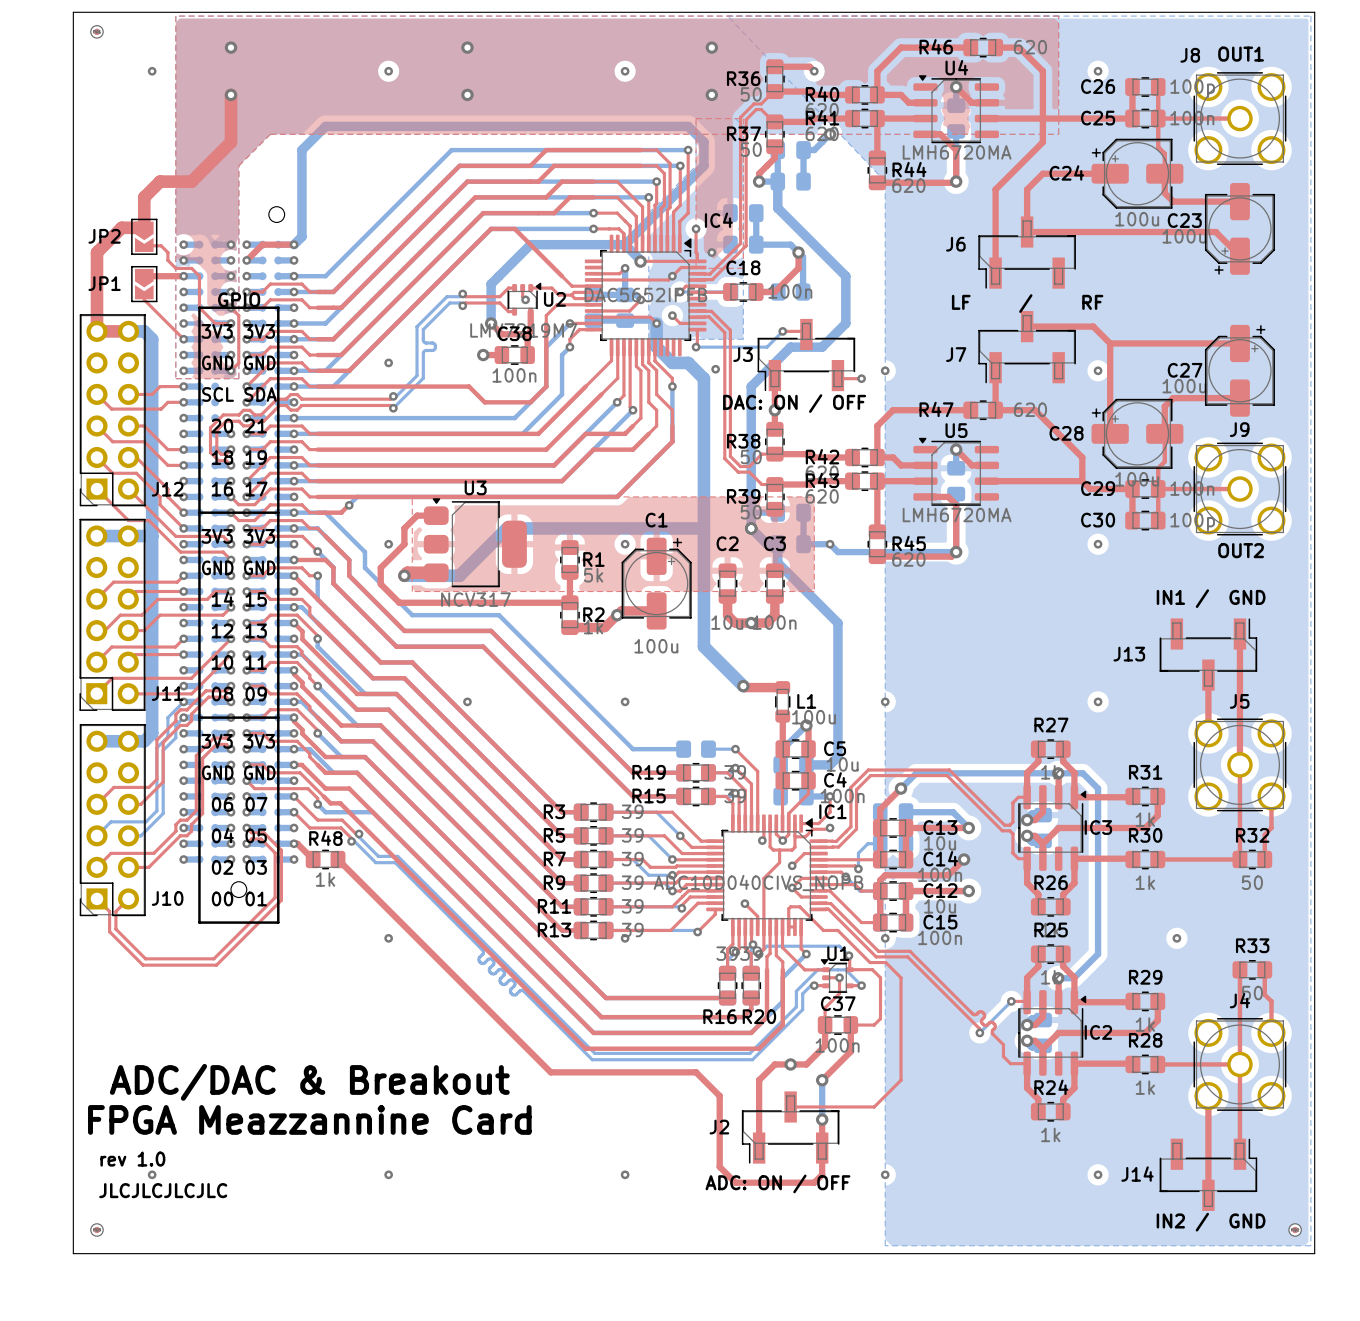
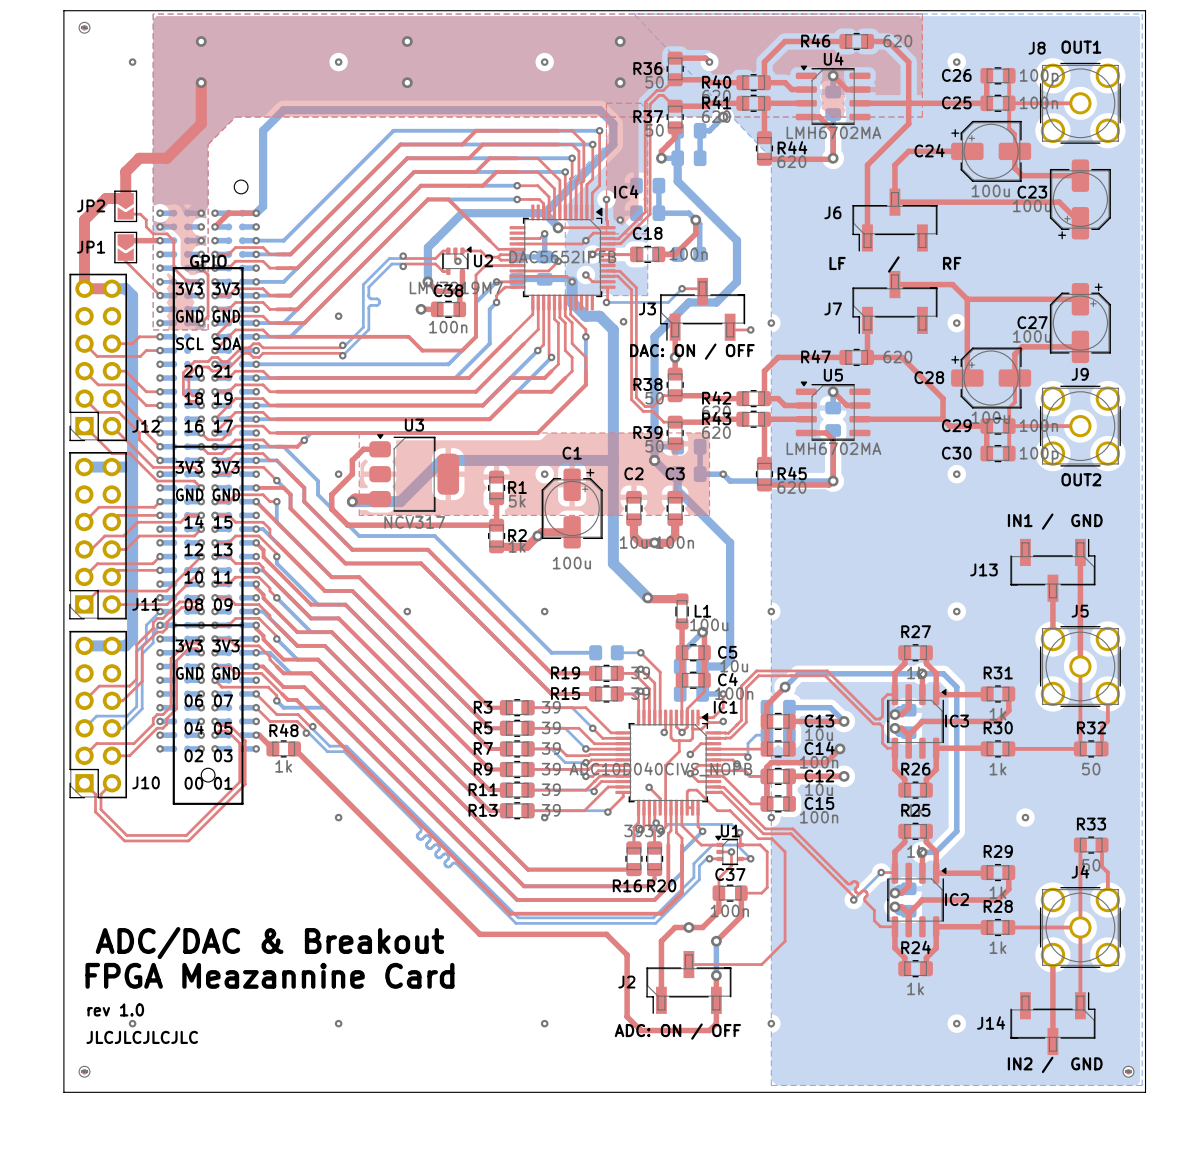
U4 value: LMH6720MA (957, 152) -> LMH6702MA (833, 132)
U5 value: LMH6720MA (957, 515) -> LMH6702MA (833, 448)
text: FPGA Meazzannine Card (309, 1119) -> FPGA Meazannine Card (269, 975)

